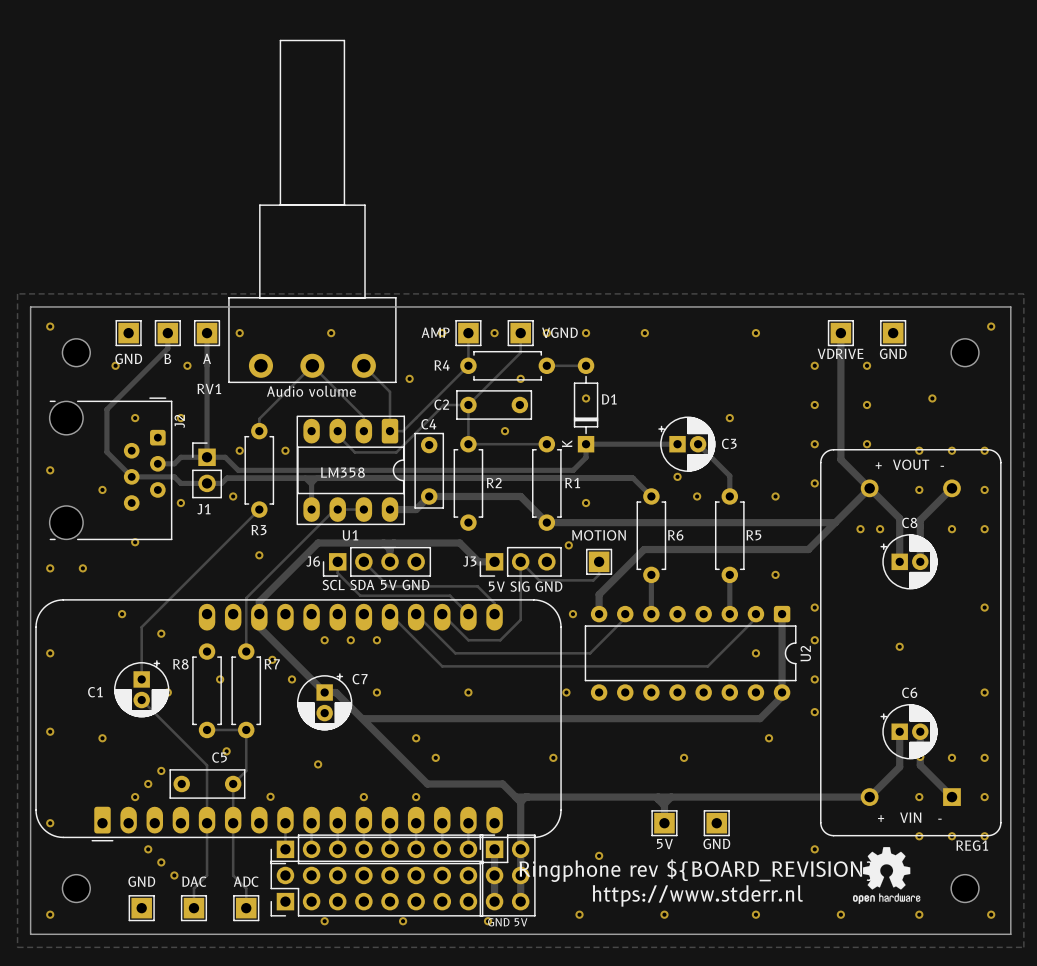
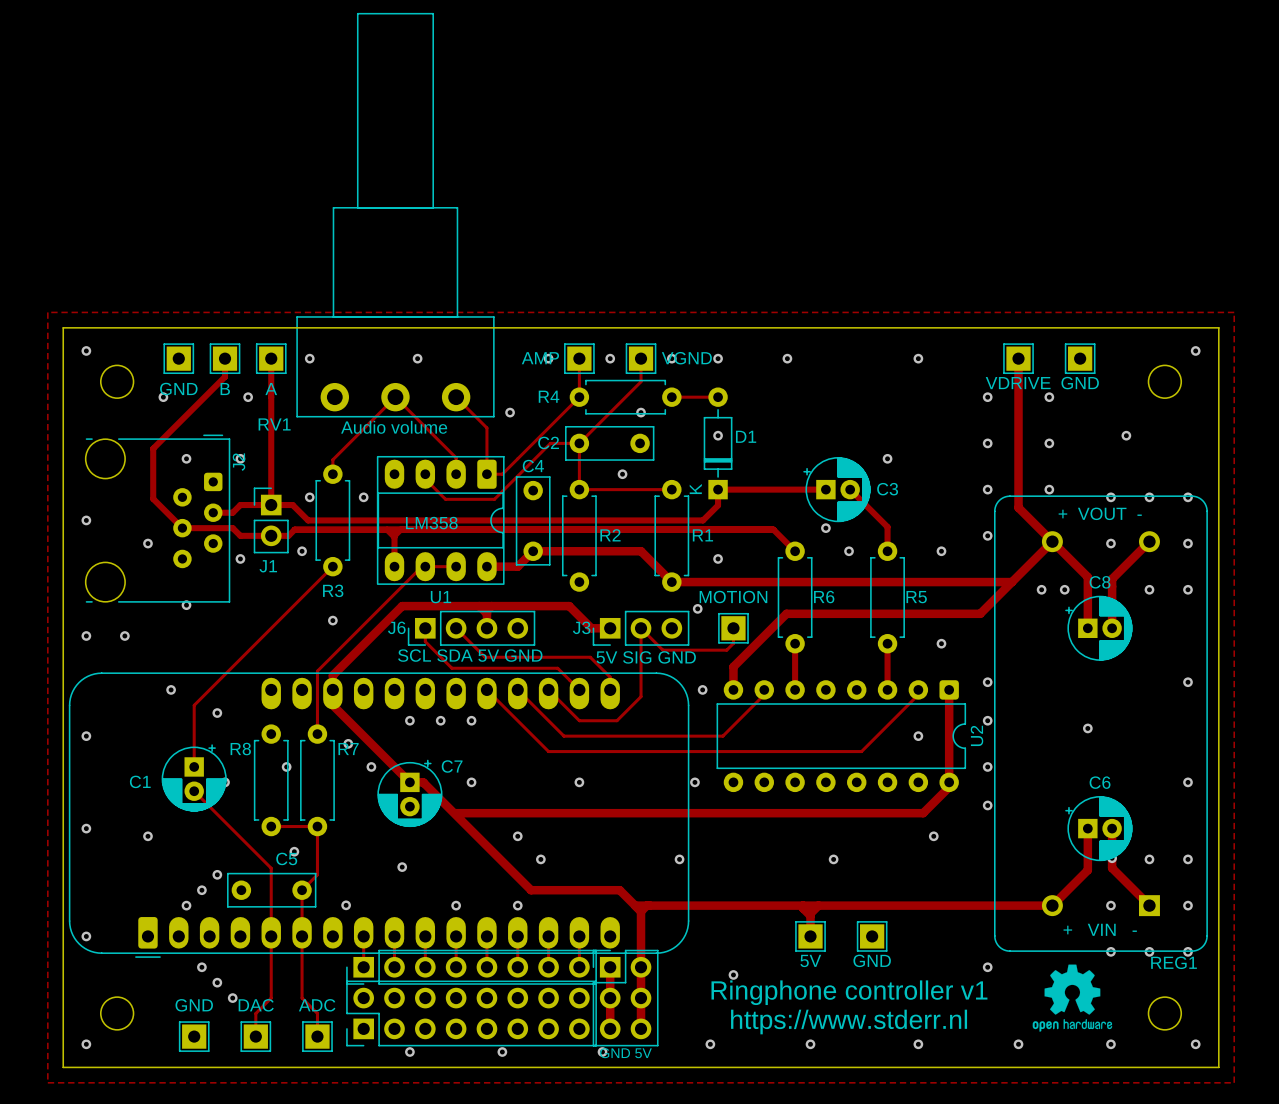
text: Ringphone rev ${BOARD_REVISION} (697, 870) -> Ringphone controller v1 (849, 992)

